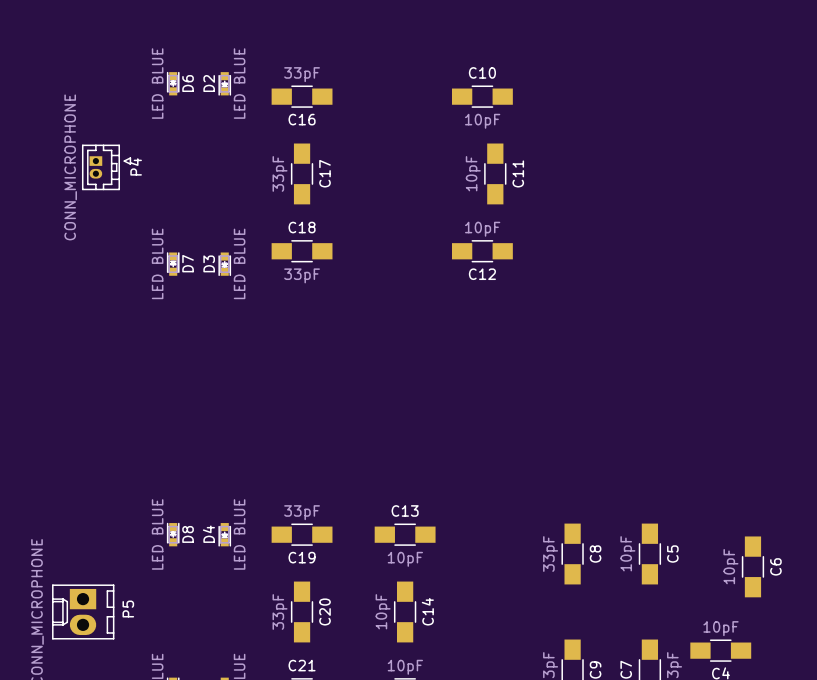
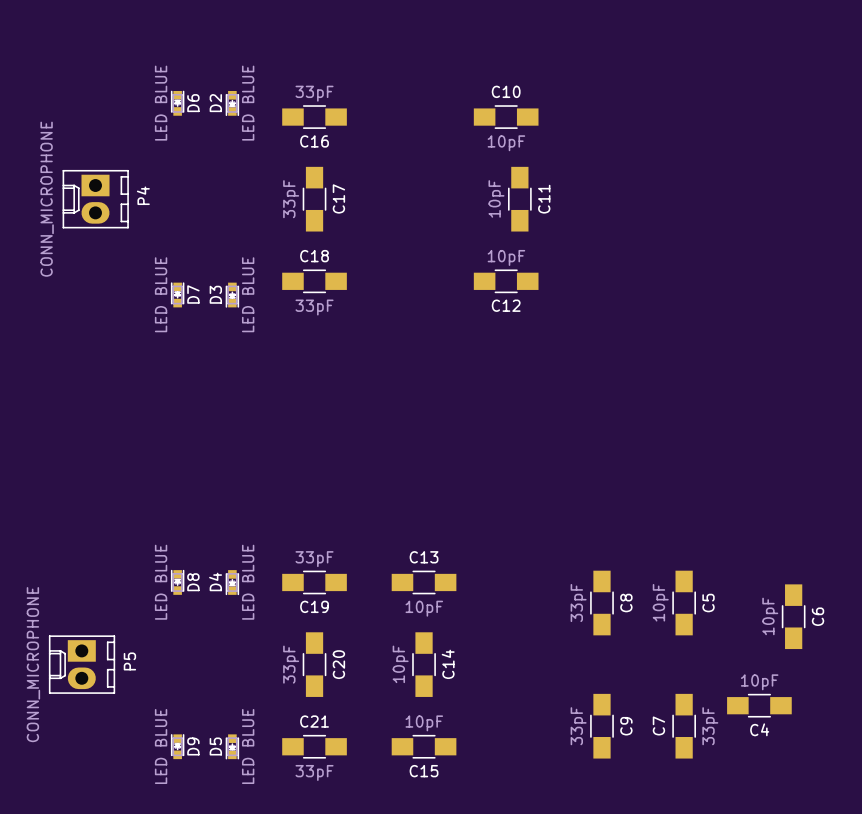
P4 footprint: [81, 144, 132, 191] -> [62, 169, 129, 229]

